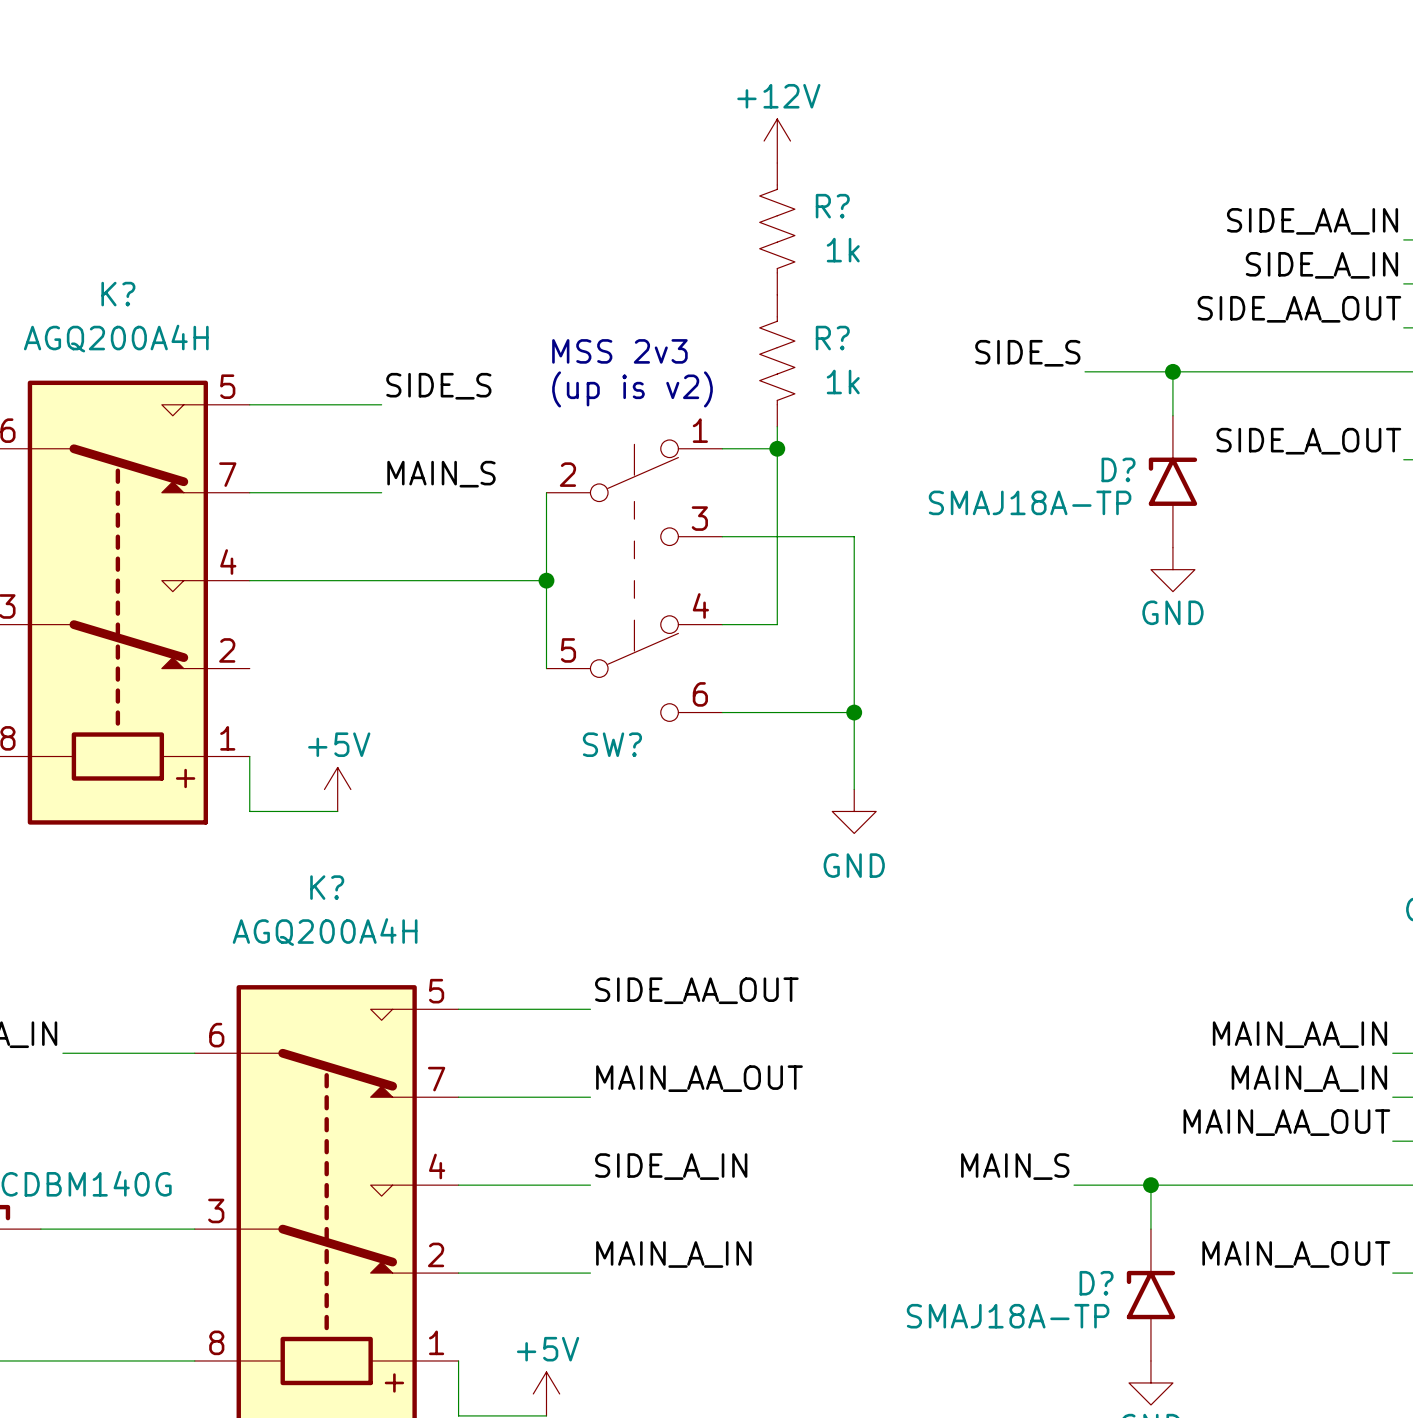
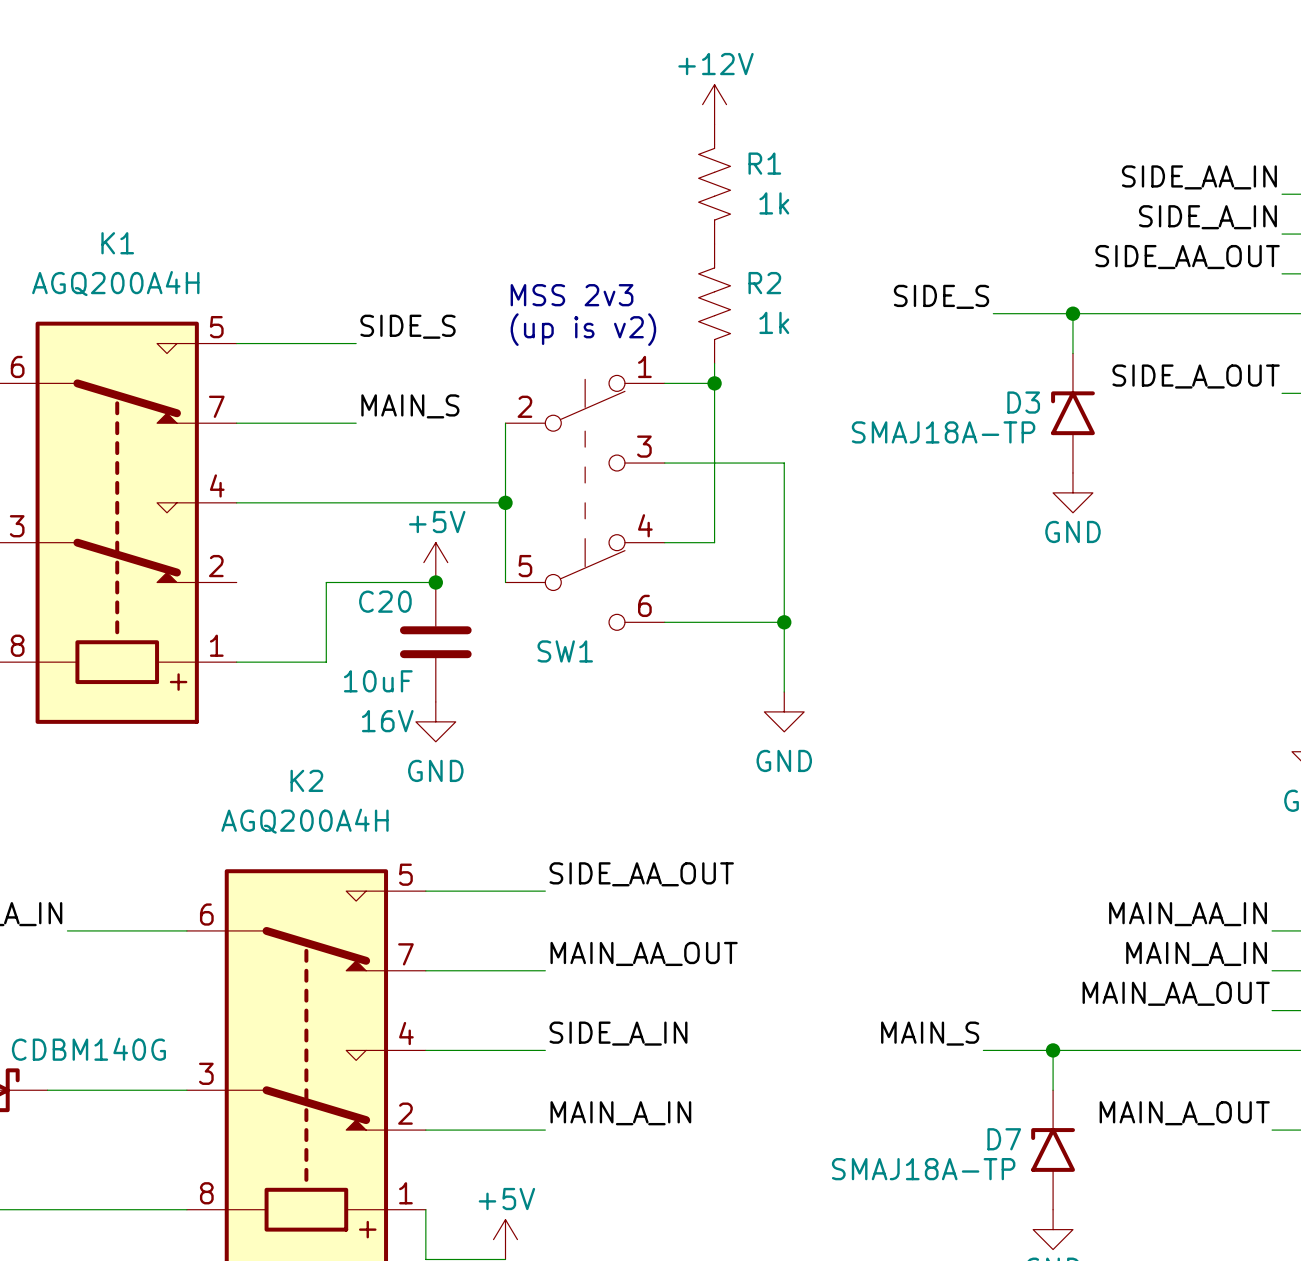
R? name: R? (832, 206) -> R1 (764, 163)
K? name: K? (118, 294) -> K1 (117, 243)
R? name: R? (832, 338) -> R2 (764, 283)
D? name: D? (1118, 469) -> D3 (1023, 402)
junction: none -> (435, 582)
C20: none -> 10uF (435, 642)
SW? name: SW? (612, 744) -> SW1 (565, 651)
wire: (249, 756) (249, 811) (337, 811) -> (236, 662) (326, 662) (326, 582) (435, 582)
power symbol position: +5V (337, 789) -> +5V (435, 562)
power symbol: none -> GND (435, 721)
K? name: K? (327, 887) -> K2 (306, 780)
D? name: D? (1096, 1283) -> D7 (1004, 1139)

